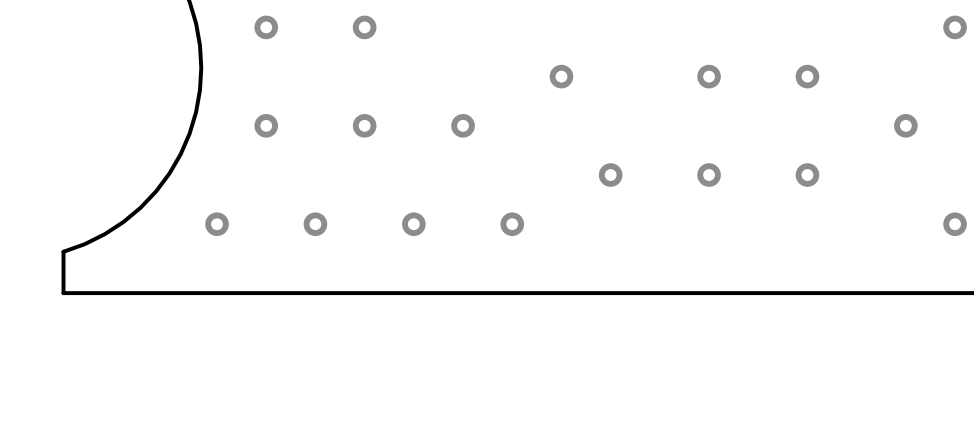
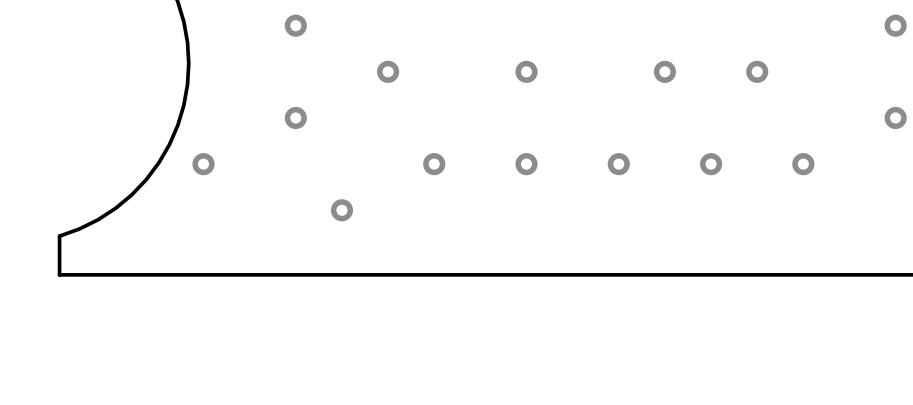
via: (266, 27) -> none
via: none -> (295, 25)
via: (364, 27) -> none
via: none -> (388, 71)
via: (266, 125) -> none
via: none -> (295, 117)
via: (364, 125) -> none
via: (463, 125) -> none
via: (905, 125) -> none
via: none -> (895, 117)
via: none -> (203, 164)
via: none -> (434, 164)
via: none -> (526, 164)
via: (610, 175) -> none
via: none -> (618, 164)
via: (709, 175) -> none
via: none -> (711, 164)
via: (807, 175) -> none
via: none -> (803, 164)
via: (217, 224) -> none
via: (315, 224) -> none
via: none -> (341, 210)
via: (413, 224) -> none
via: (512, 224) -> none
via: (955, 224) -> none

